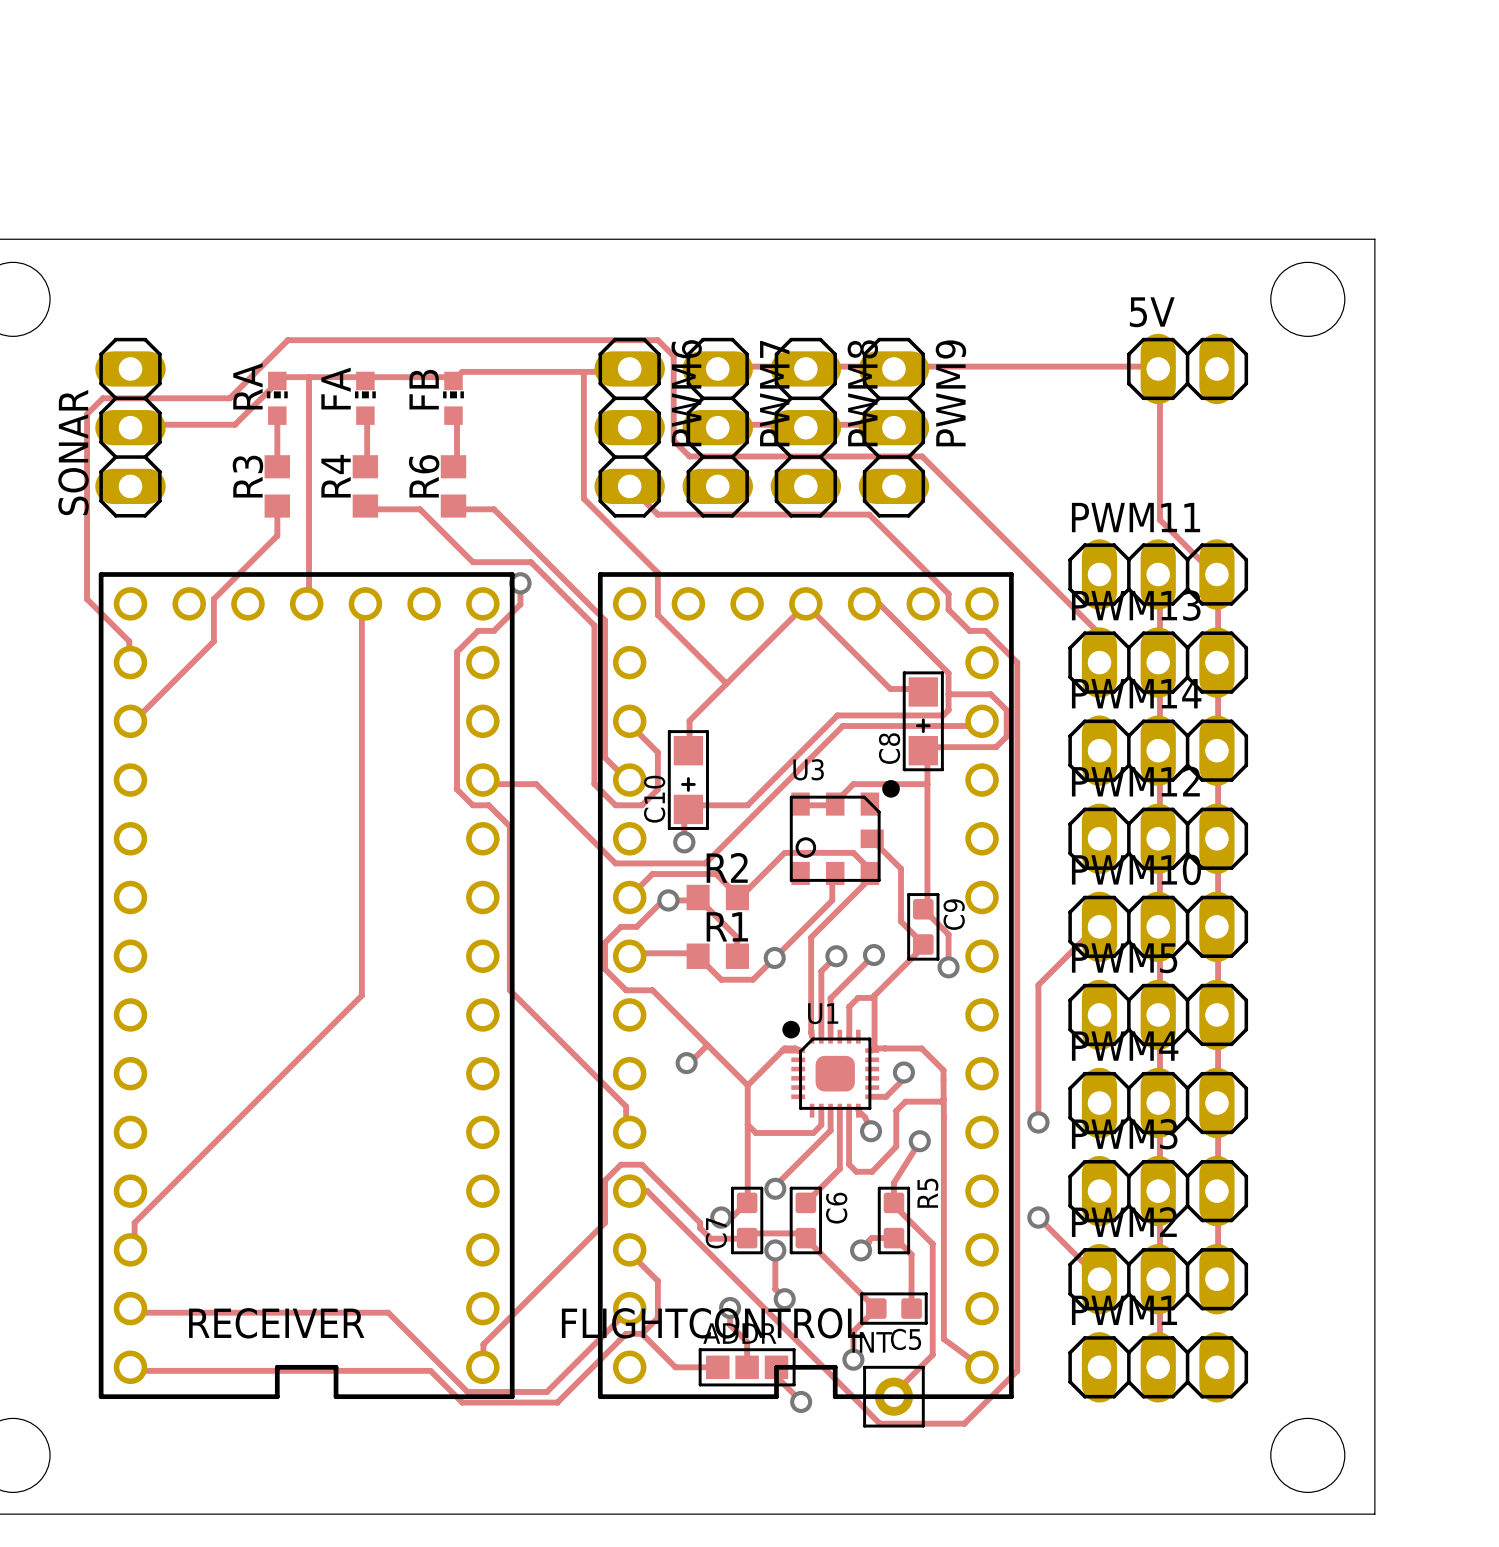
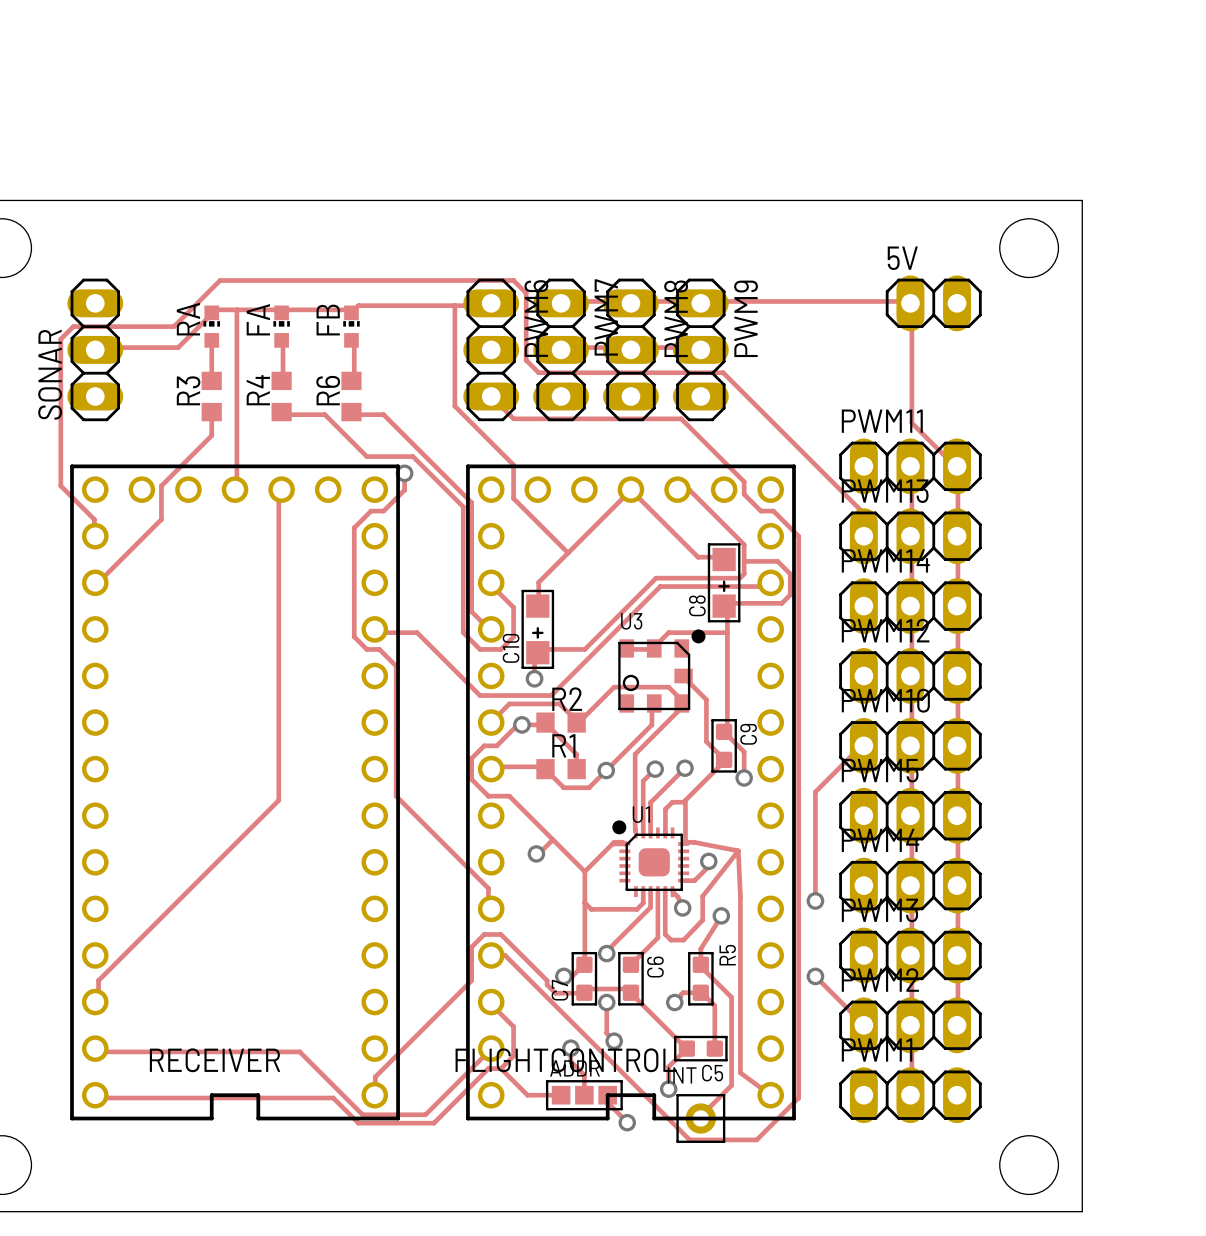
track: (885, 1048) (921, 1048) (943, 1070) (943, 1117) -> (738, 850) (740, 896)
track: none -> (693, 842) (738, 850)
track: (943, 1099) (941, 1101) (905, 1101) (896, 1110) (896, 1116) -> (738, 850) (702, 896)

